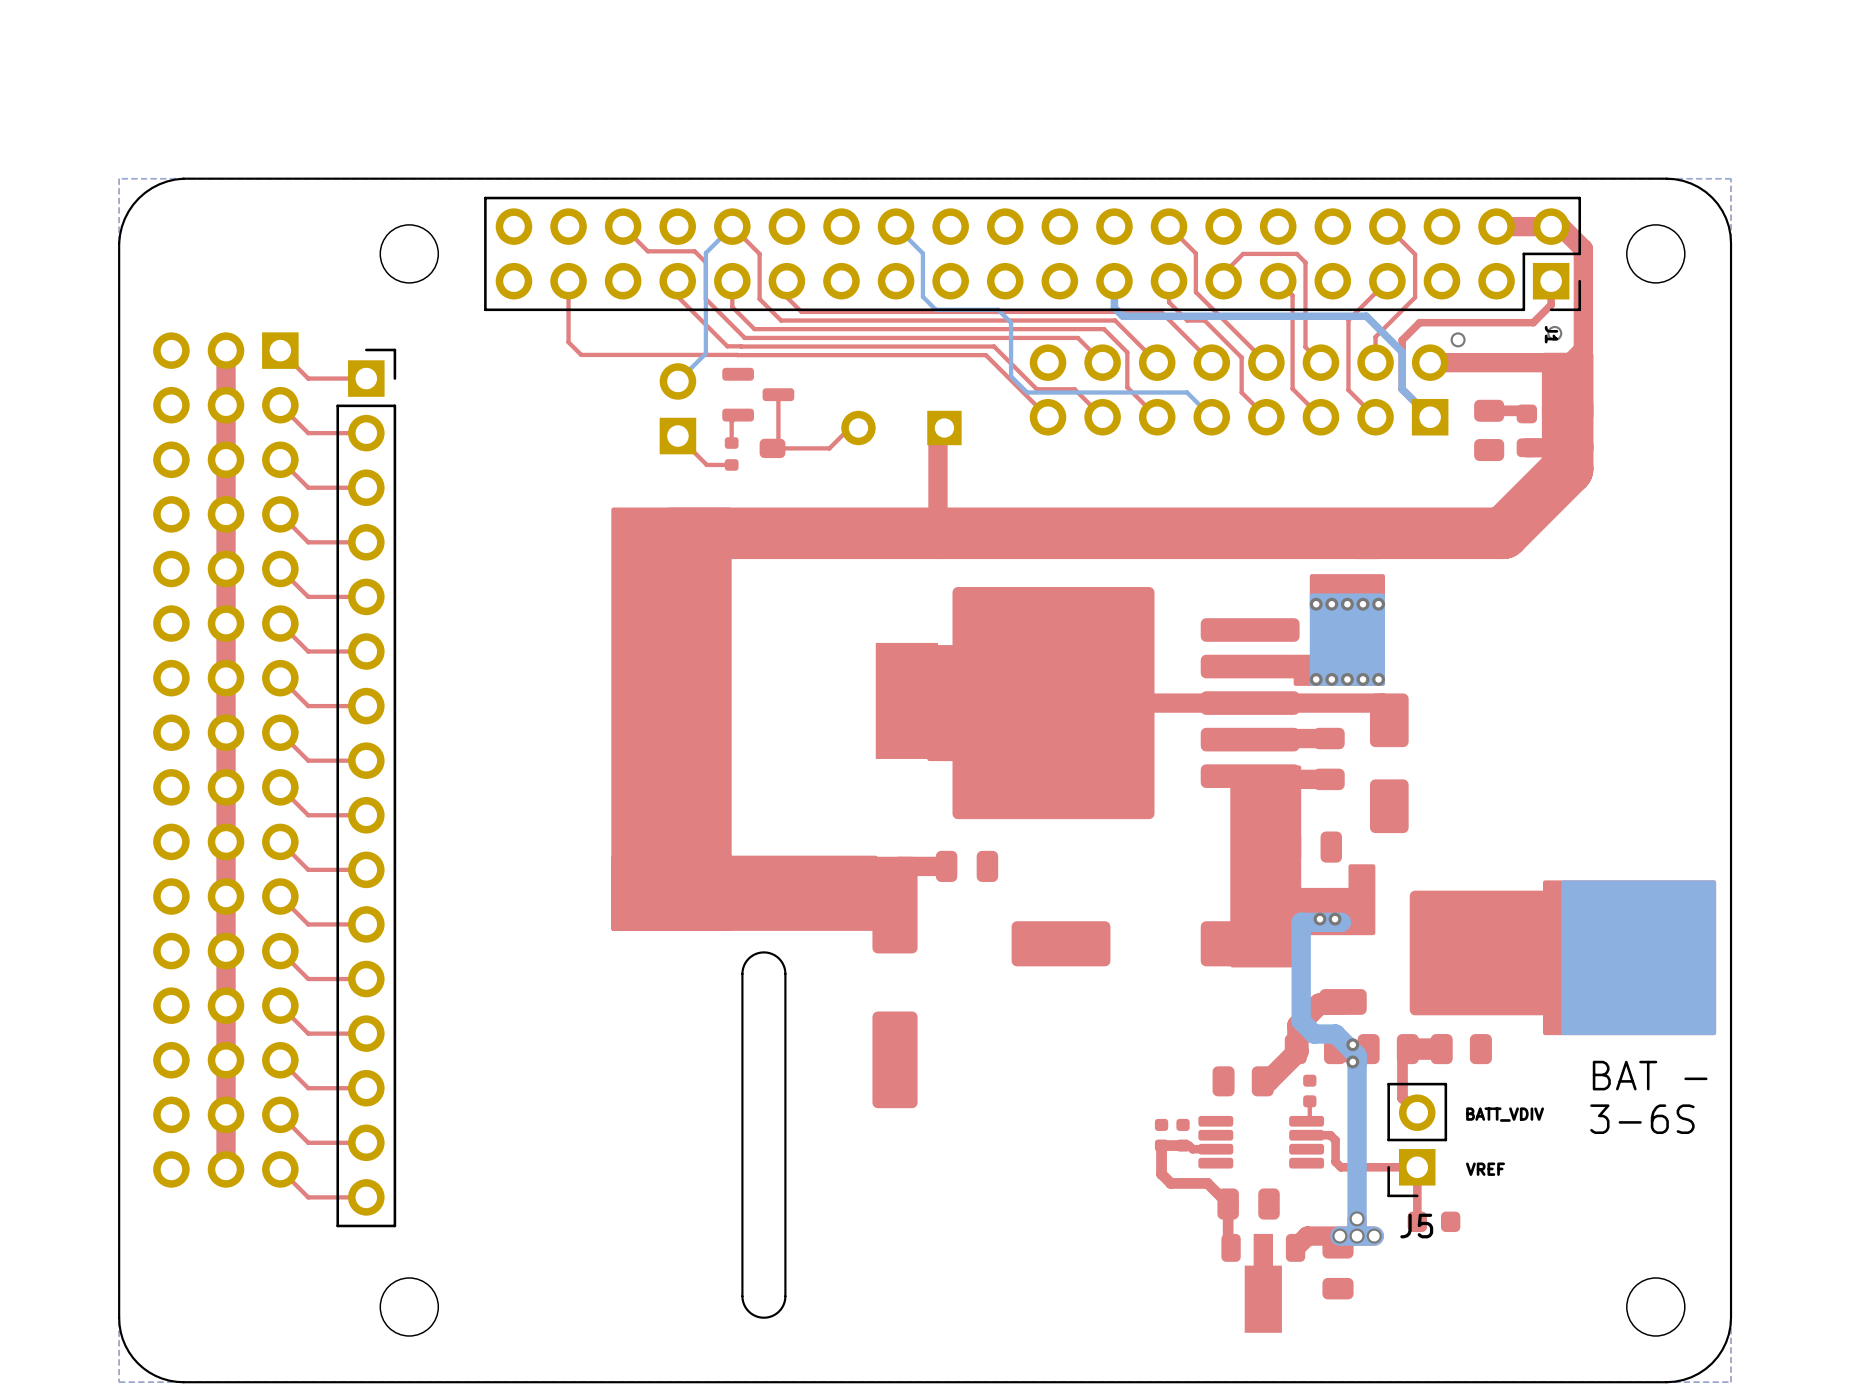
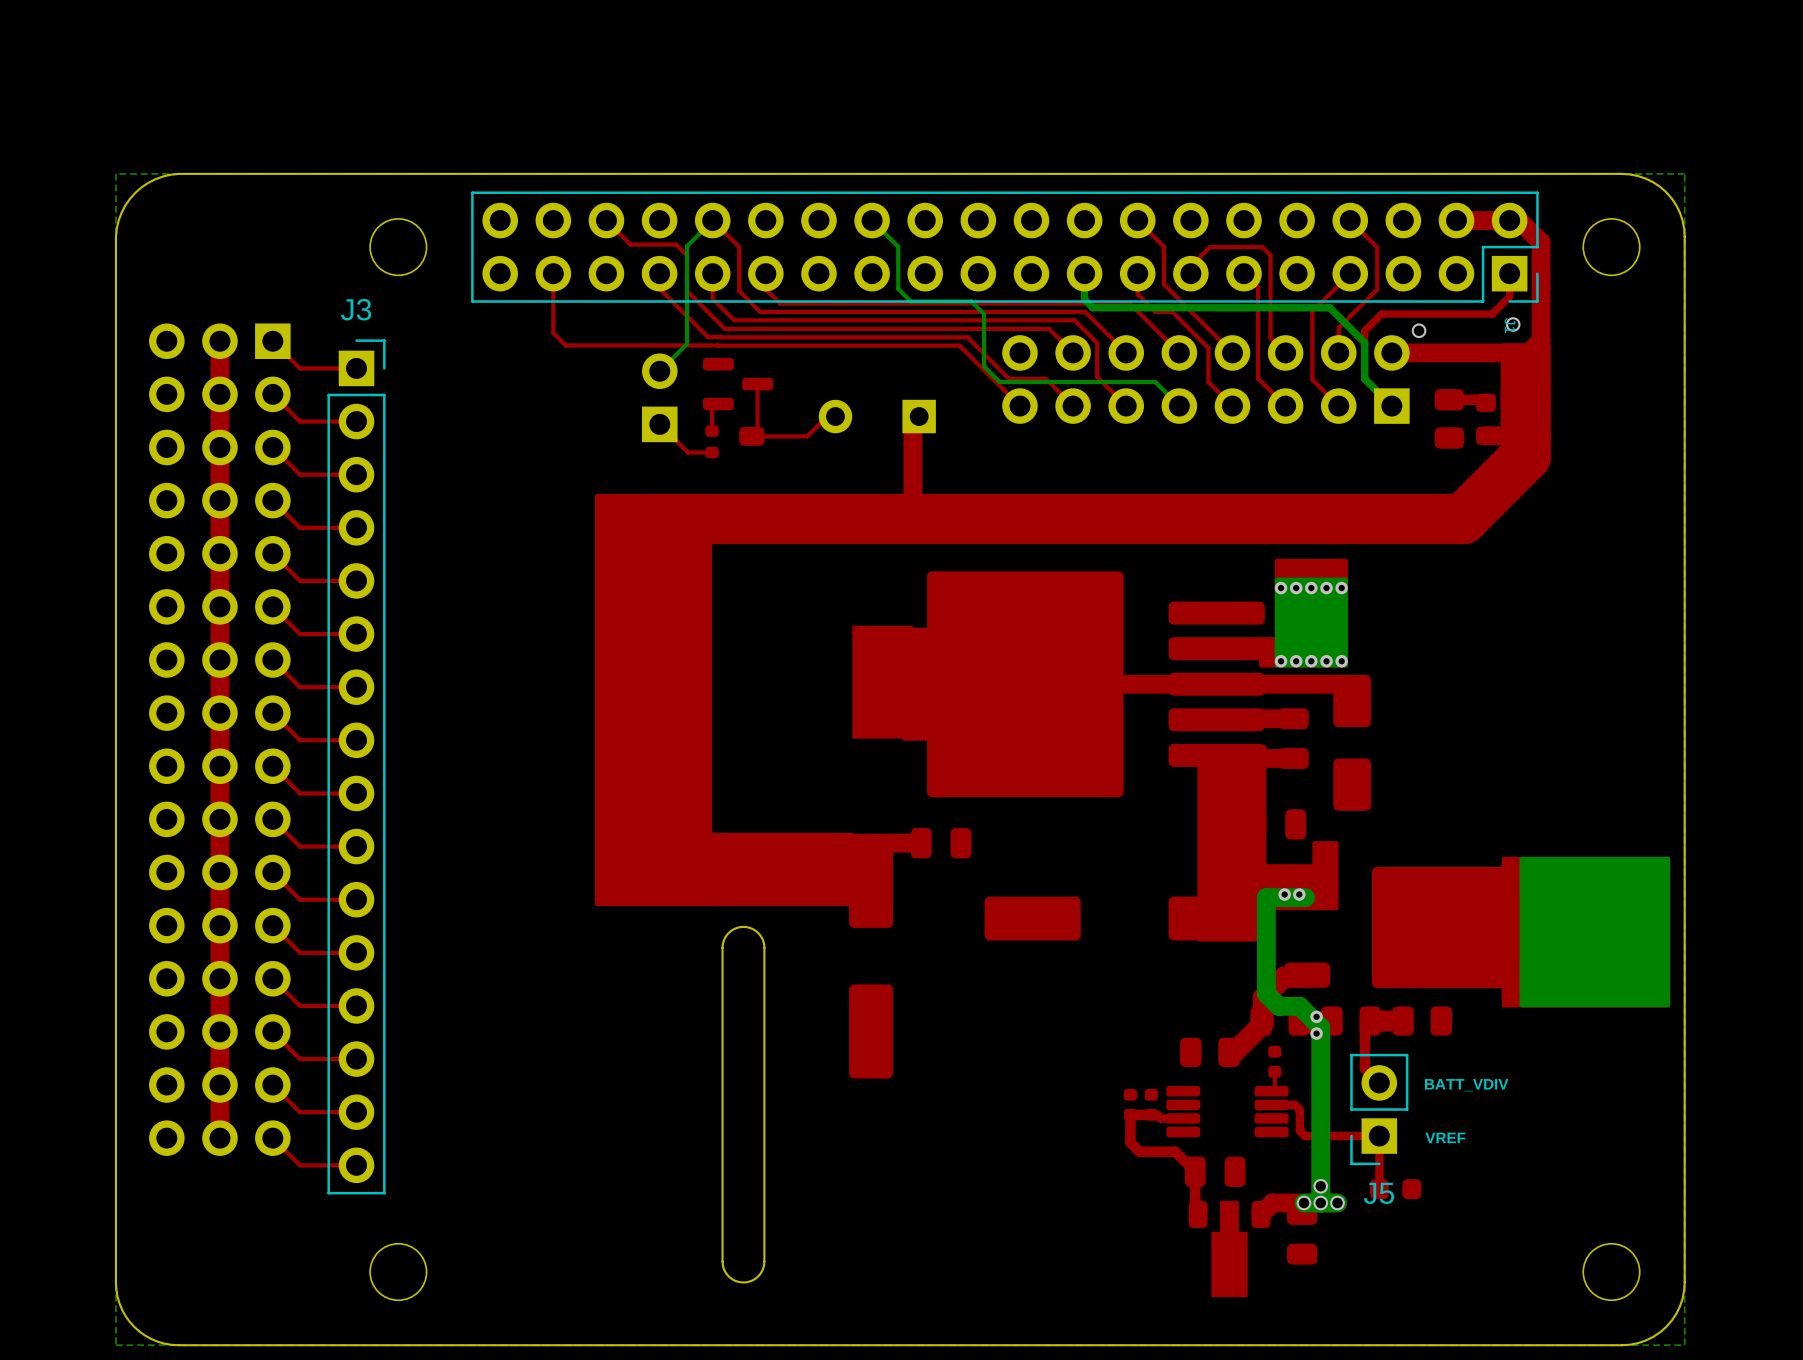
J3 name: none -> J3 (356, 309)
text: BAT - (1650, 1075) -> none
text: 3-6S (1642, 1119) -> none

